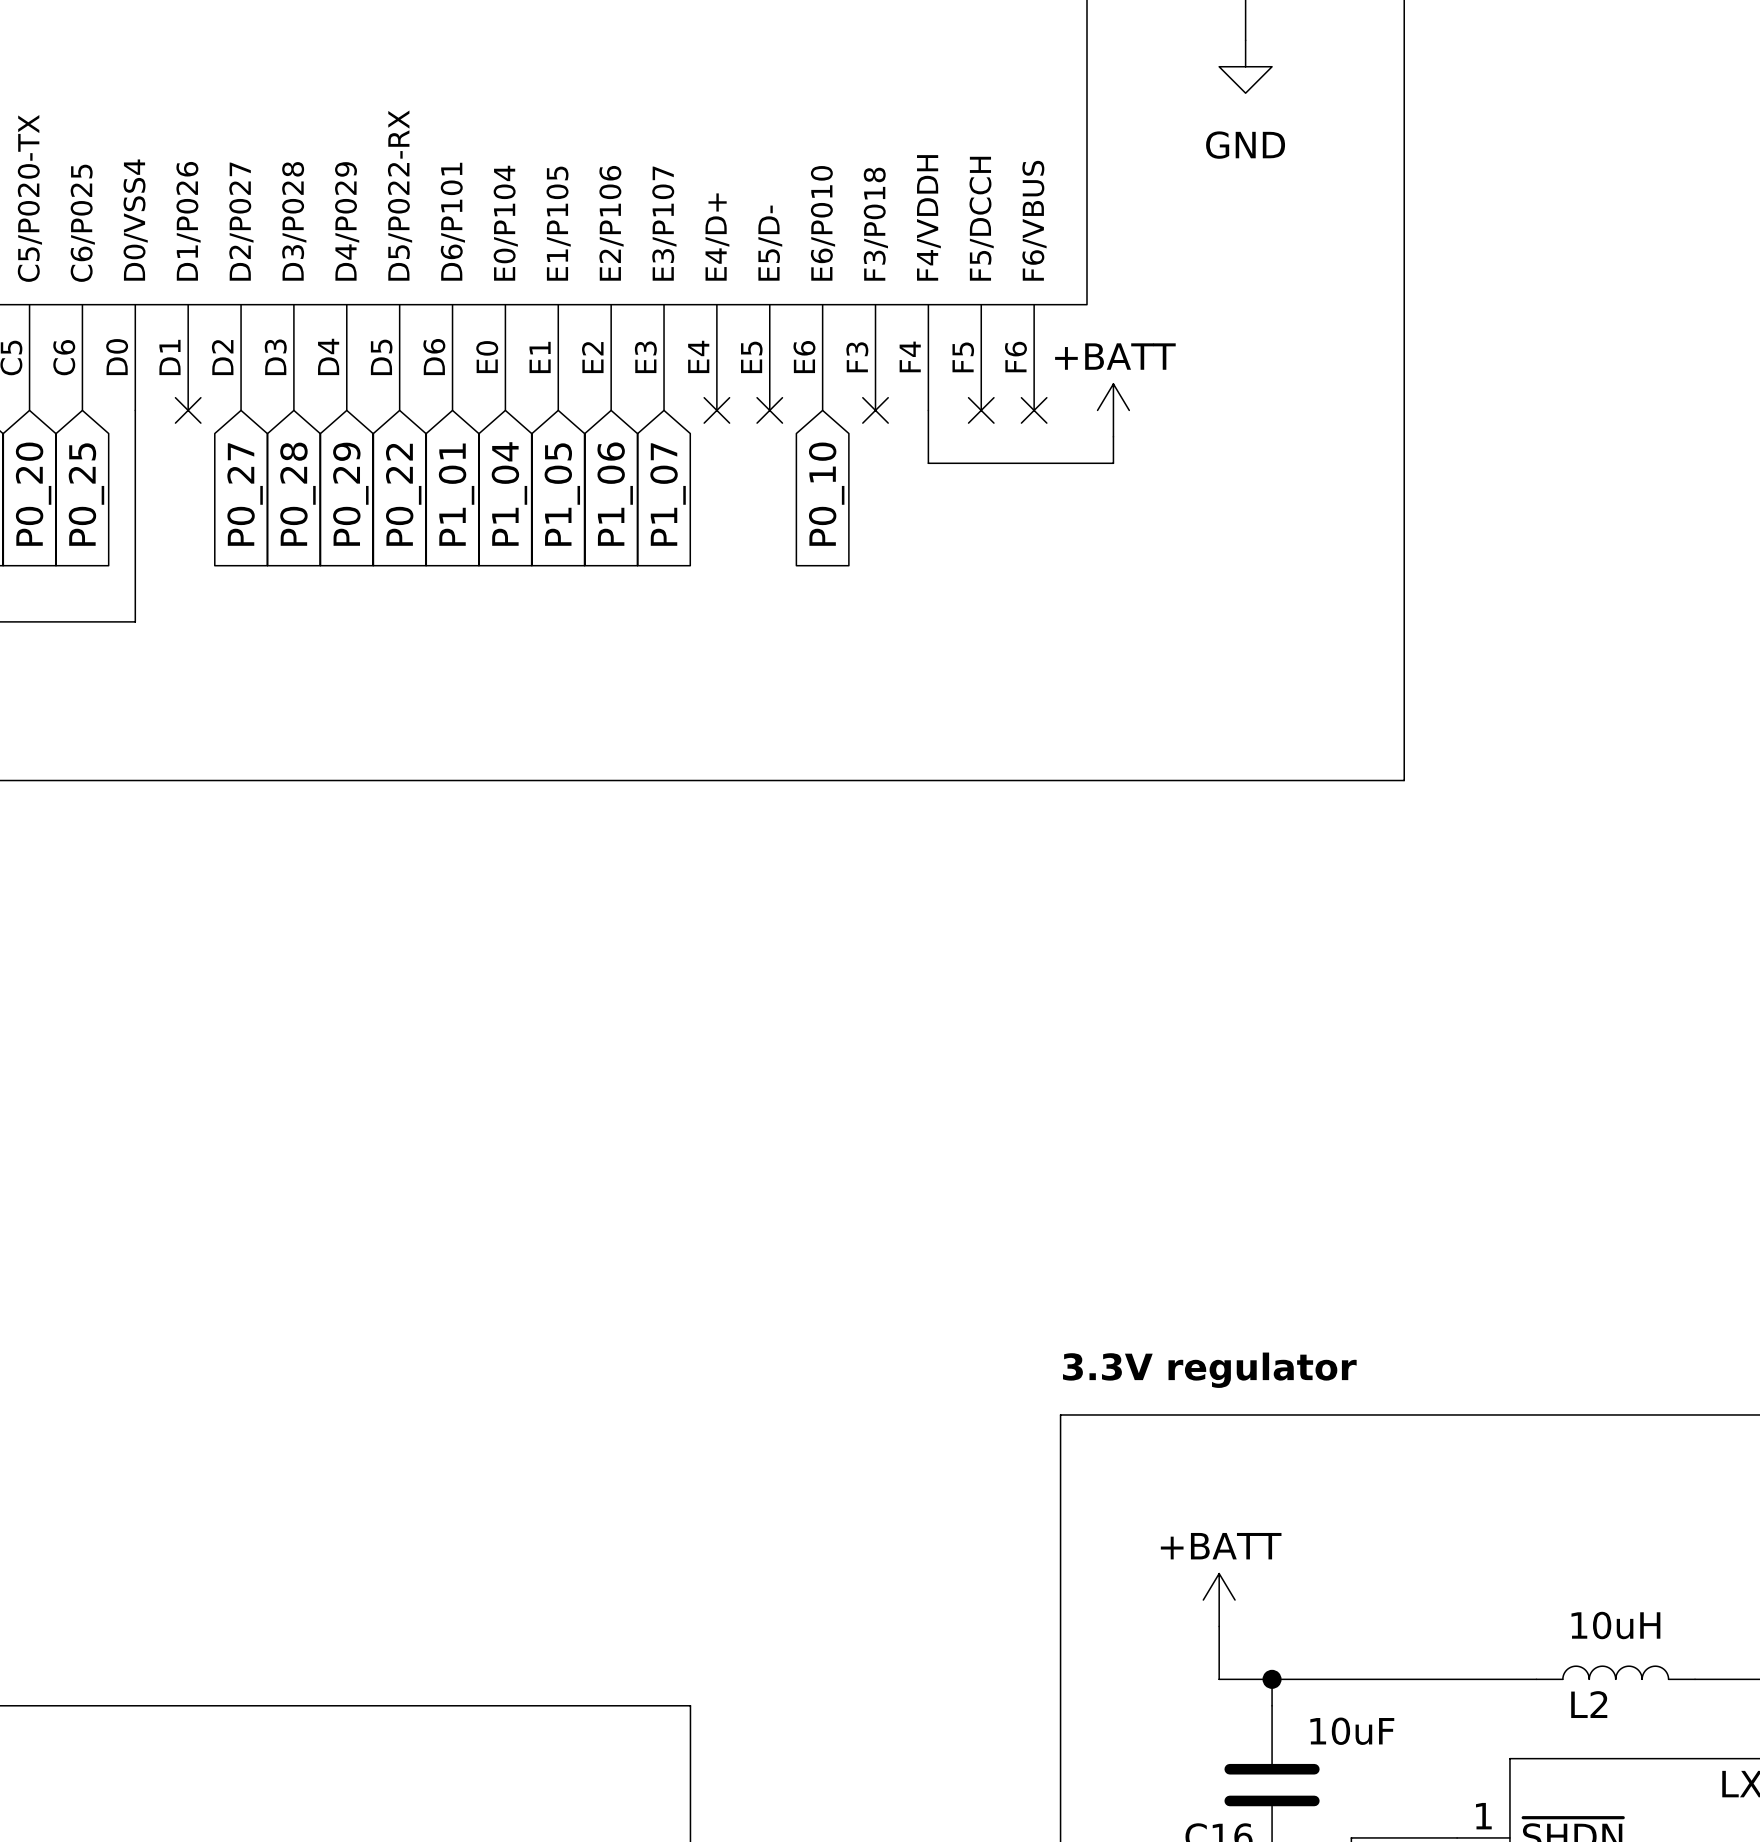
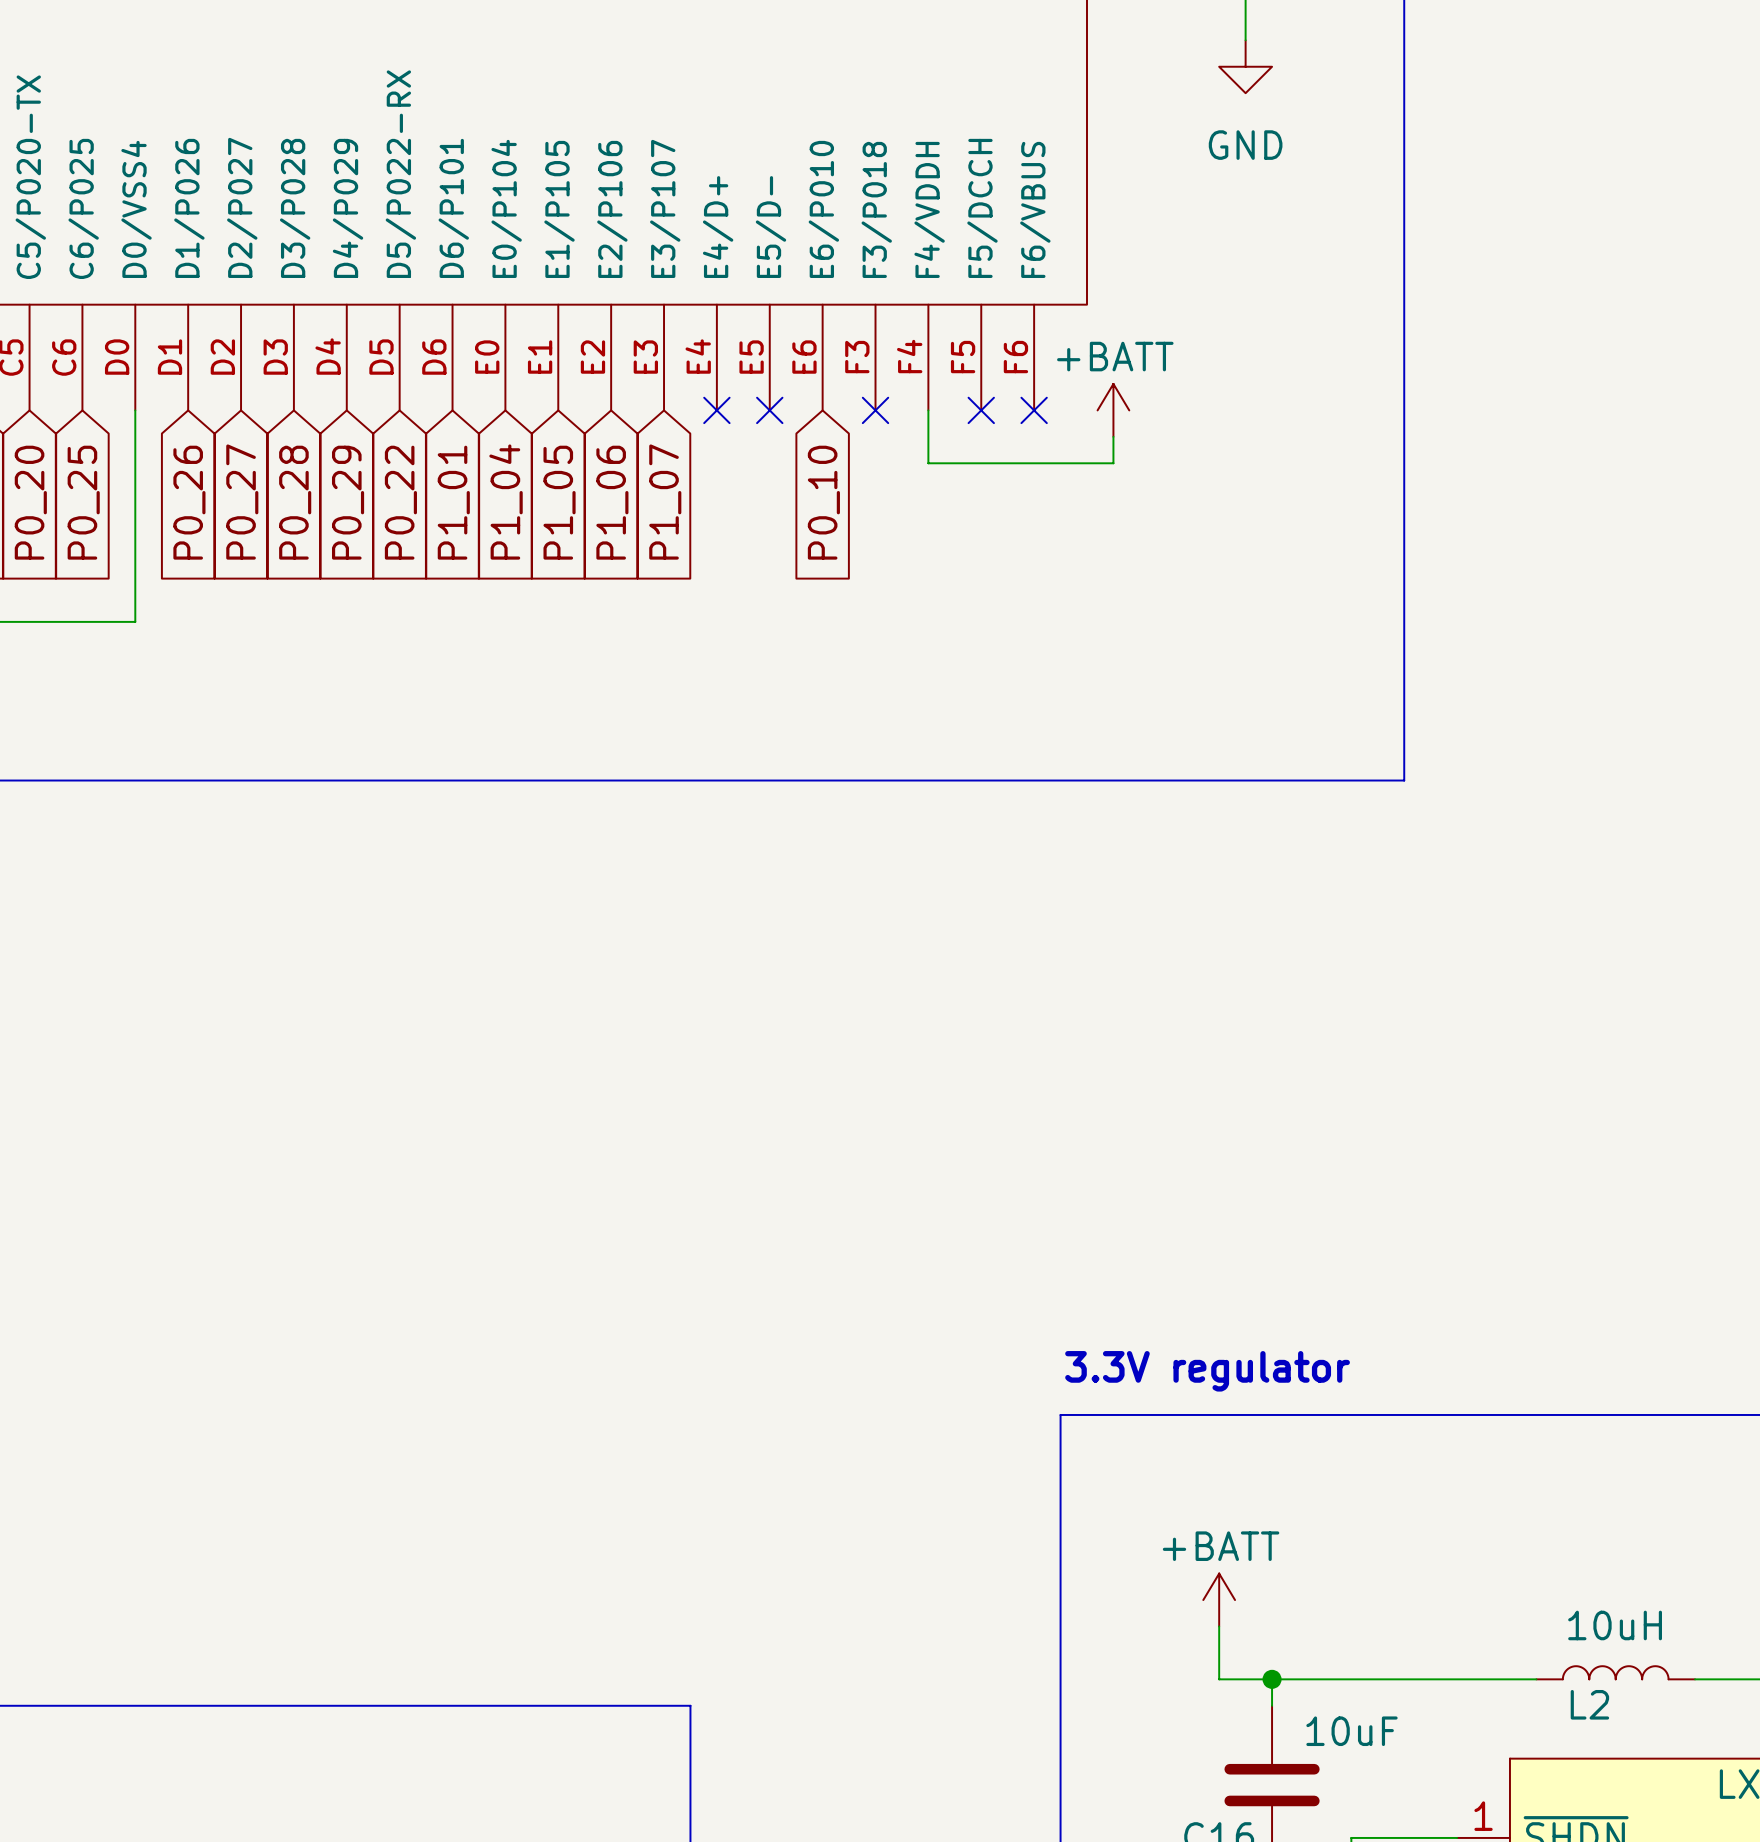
no-connect mark: (188, 410) -> none
global label: none -> P0_26 (189, 502)

